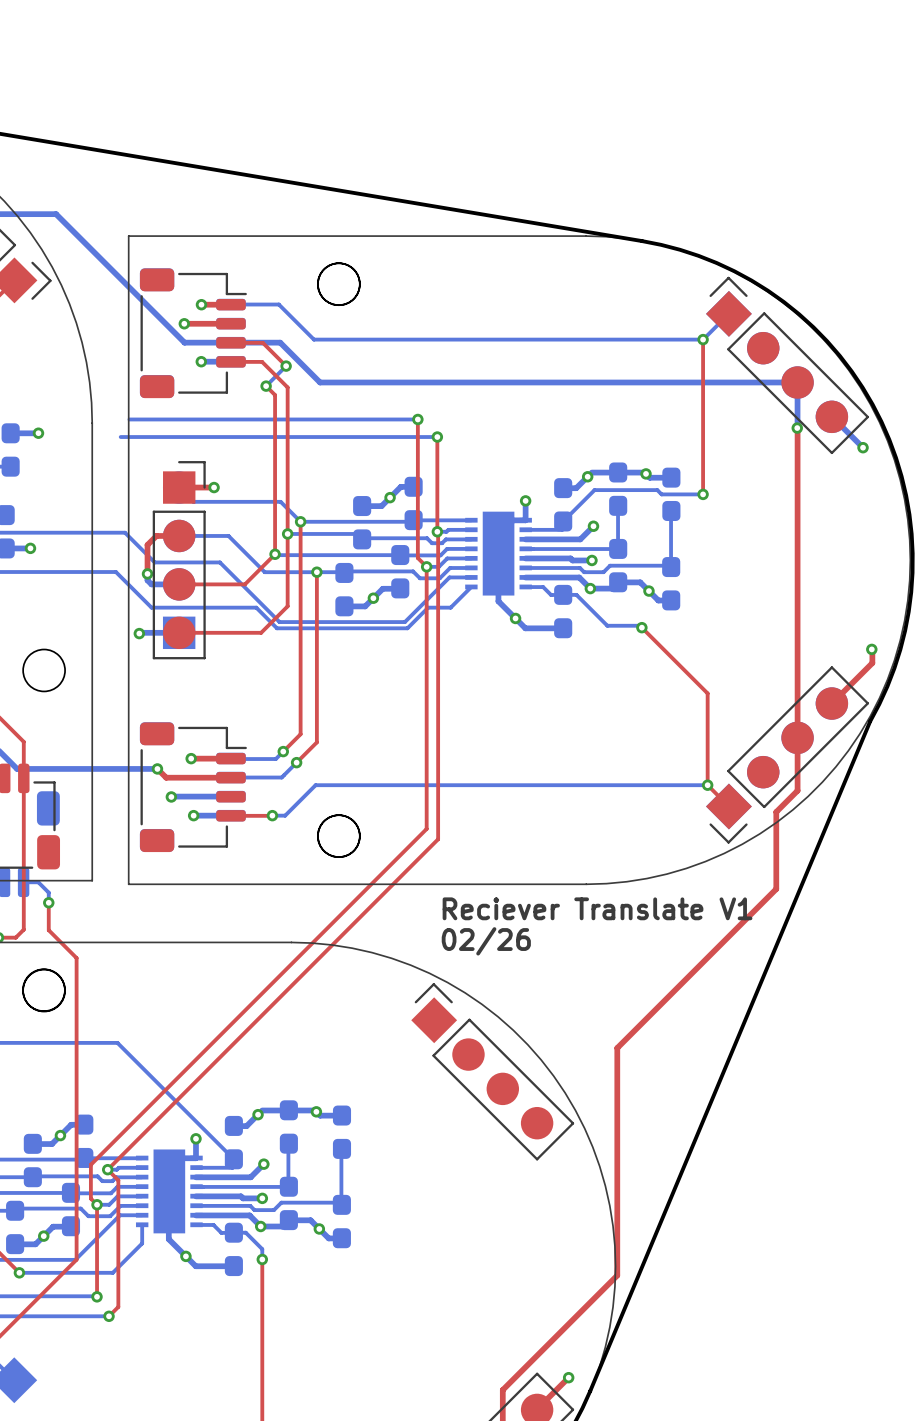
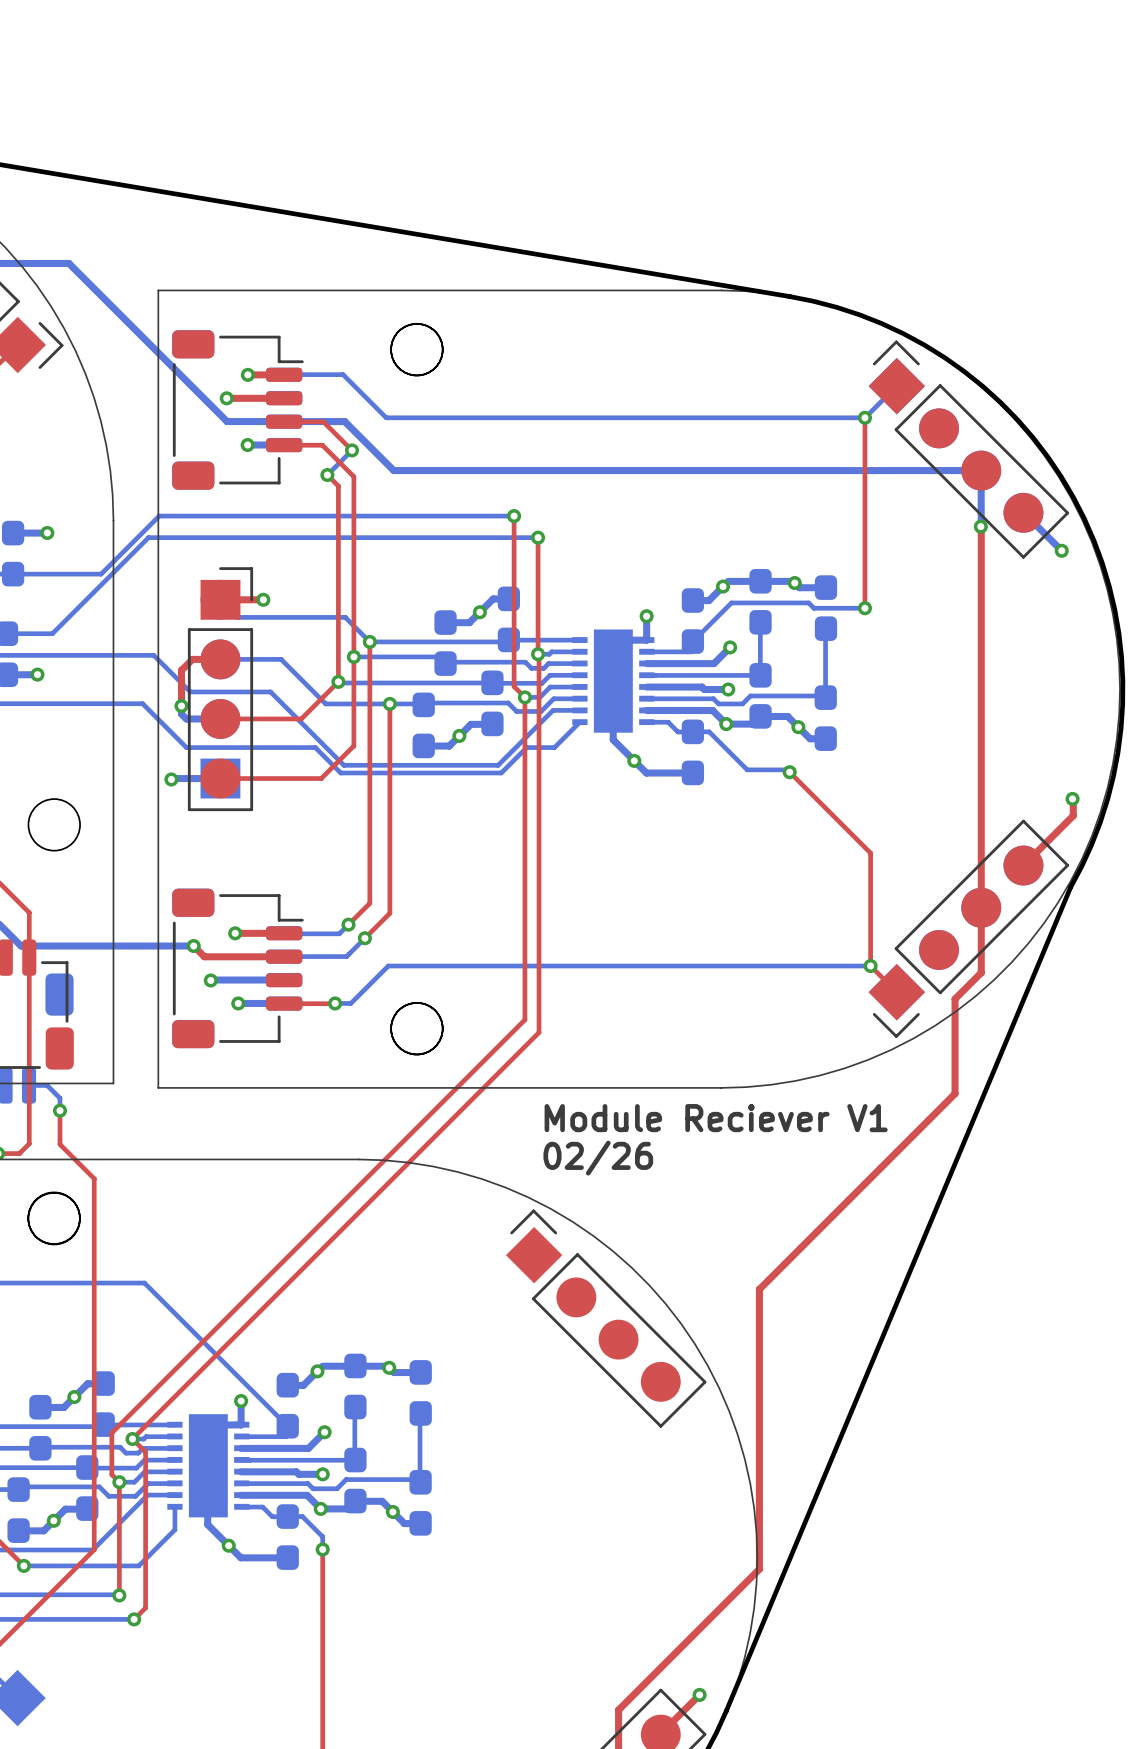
bottom track: none -> (159, 516) (101, 574) (13, 574)
bottom track: none -> (148, 537) (52, 633) (6, 633)
text: Reciever Translate V1 (597, 908) -> Module Reciever V1 (716, 1118)

